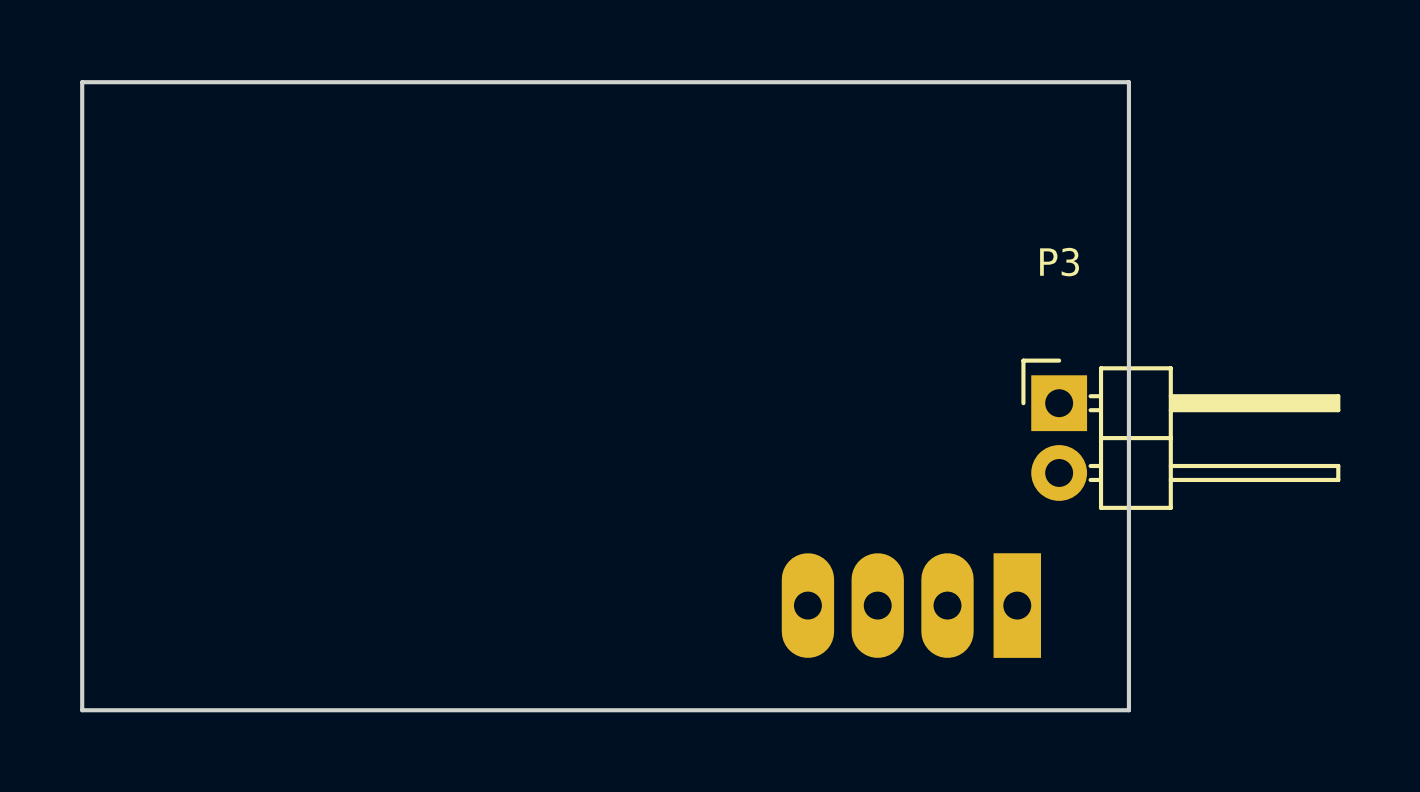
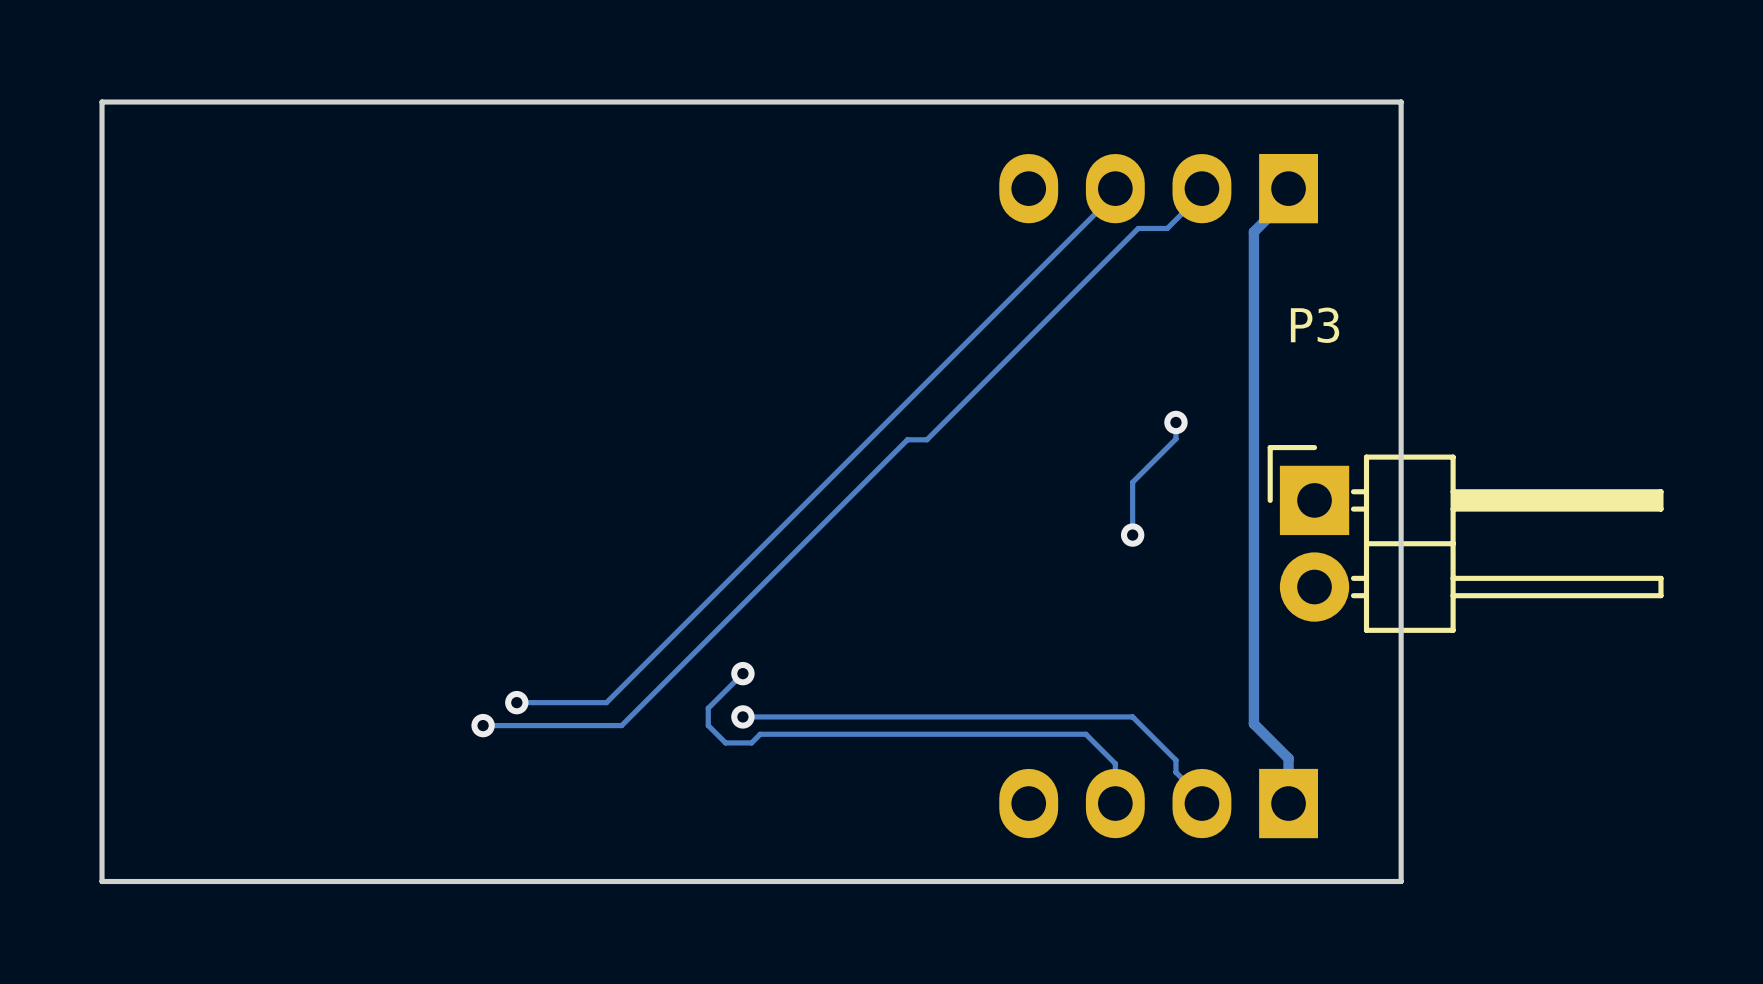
track: none -> (1115, 188) (1115, 193) (606, 702) (516, 702)
part: none -> (1158, 188)
track: none -> (1201, 188) (1201, 193) (1167, 228) (1138, 228) (926, 439) (907, 439) (621, 725) (483, 725)
track: none -> (1288, 188) (1288, 197) (1253, 231) (1253, 723) (1288, 758) (1288, 803)
track: none -> (1175, 422) (1175, 439) (1132, 482) (1132, 535)
via: none -> (1175, 422)
via: none -> (1132, 535)
track: none -> (742, 673) (708, 708) (708, 725) (725, 742) (751, 742) (760, 734) (1085, 734) (1115, 763) (1115, 803)
via: none -> (742, 673)
via: none -> (516, 702)
track: none -> (742, 716) (1132, 716) (1175, 760) (1175, 772) (1201, 798) (1201, 803)
via: none -> (742, 716)
via: none -> (483, 725)
part: (911, 605) -> none
part: none -> (1158, 803)

